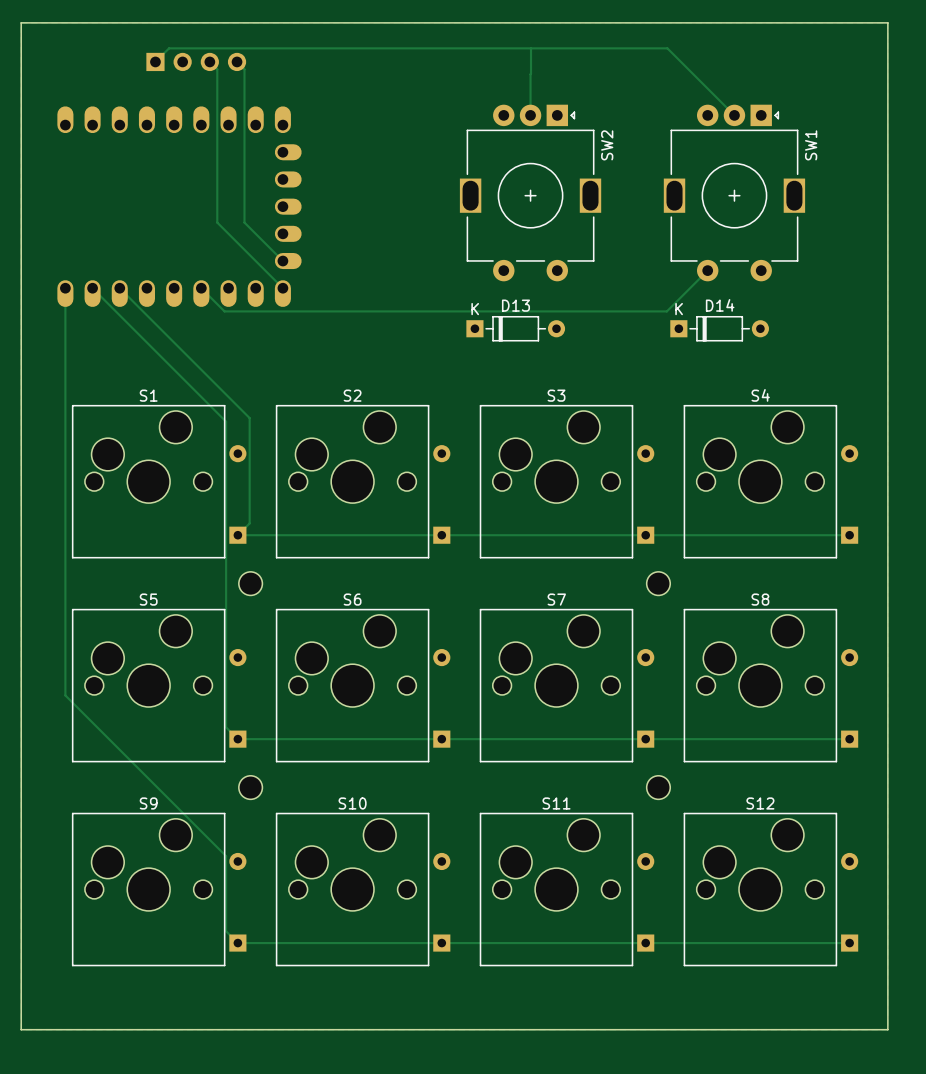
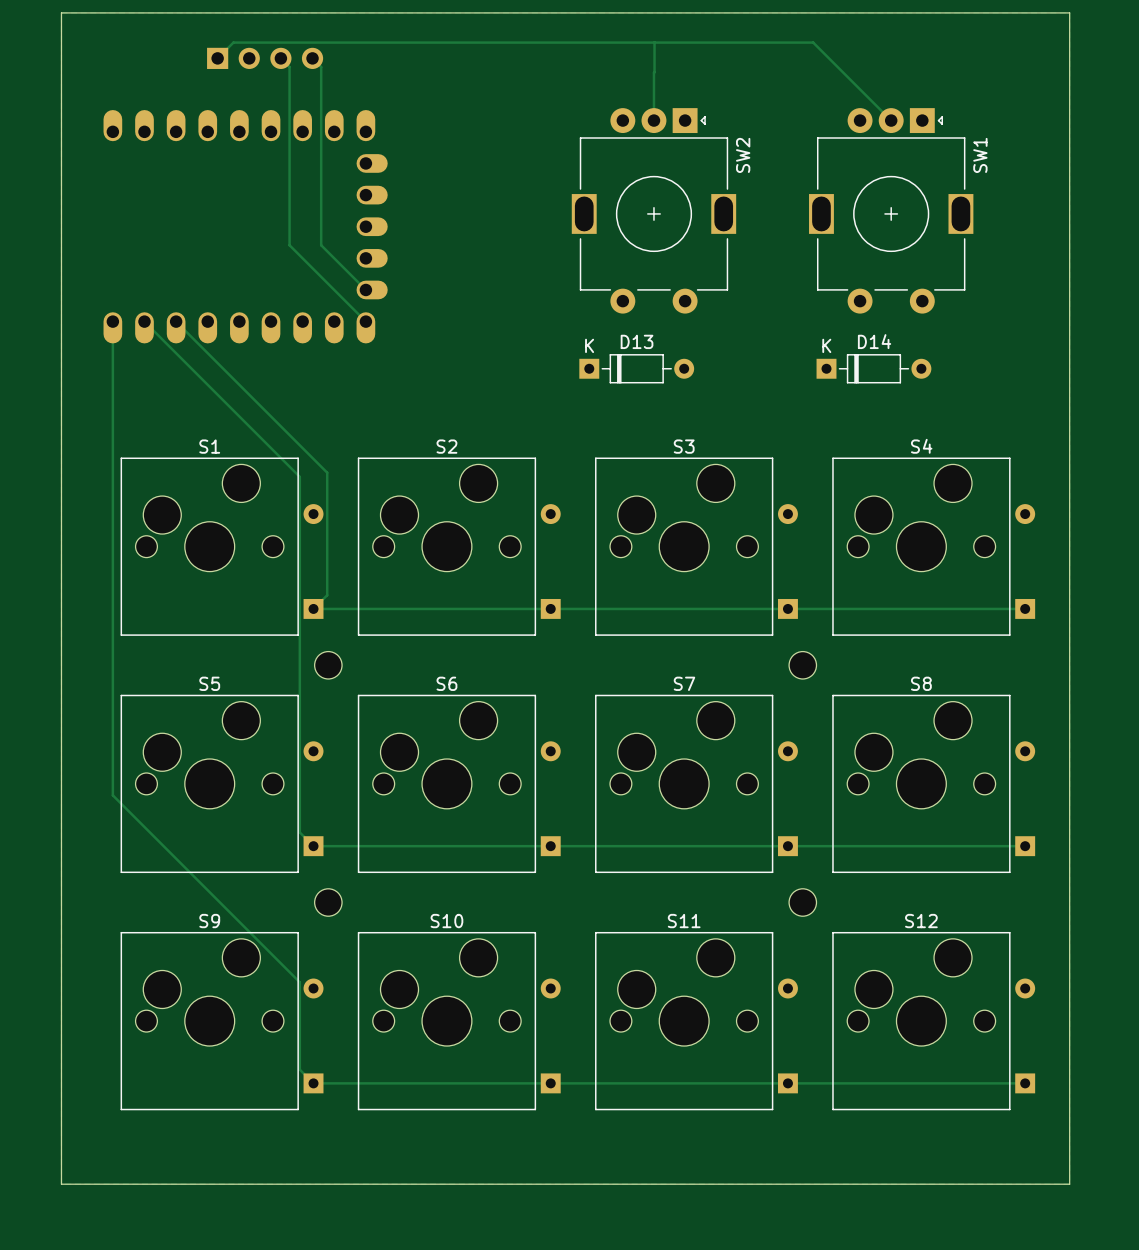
track: (707, 270) (666, 311) (224, 311) (201, 288) -> none

